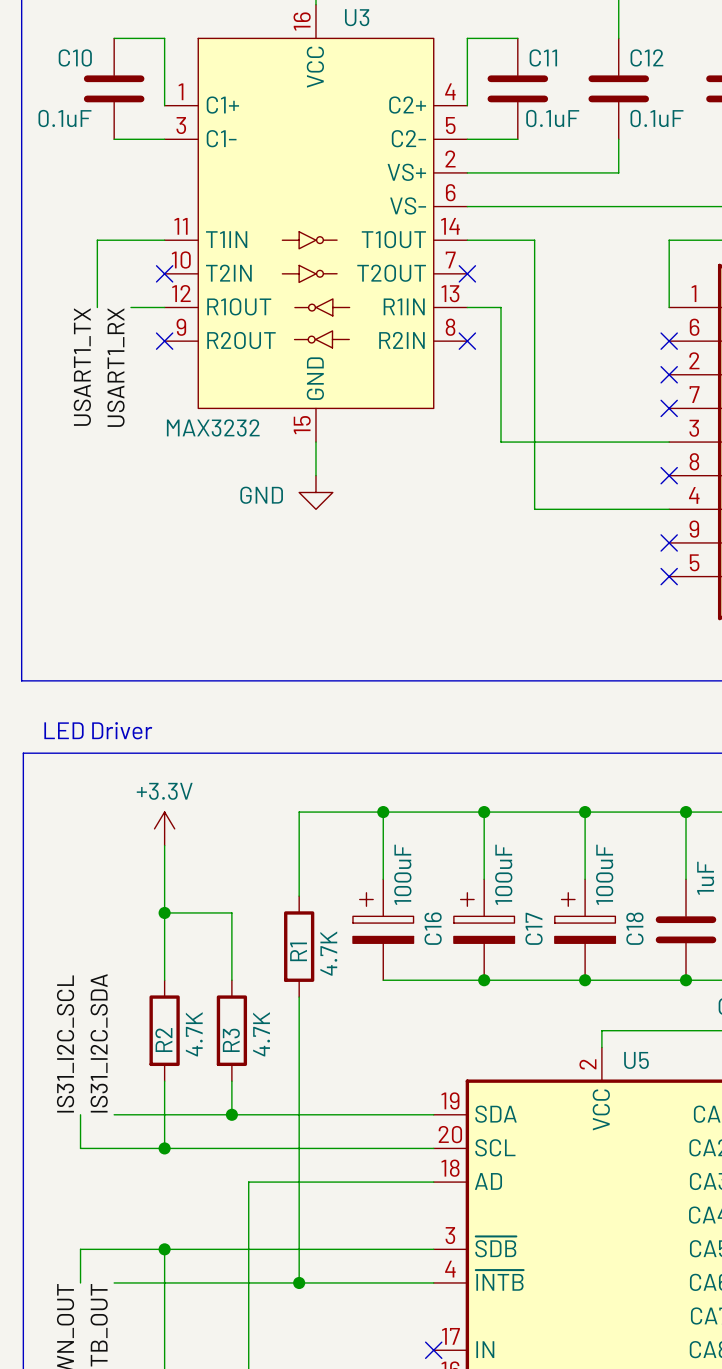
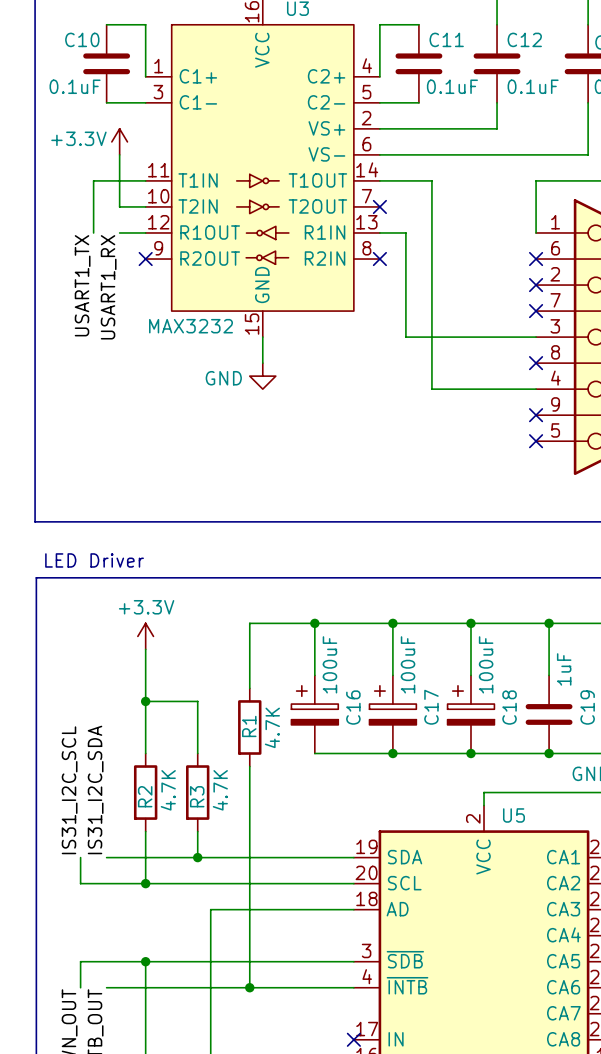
power symbol: none -> +3.3V (119, 141)
wire: none -> (119, 154) (119, 206) (145, 206)
no-connect mark: (164, 273) -> none

